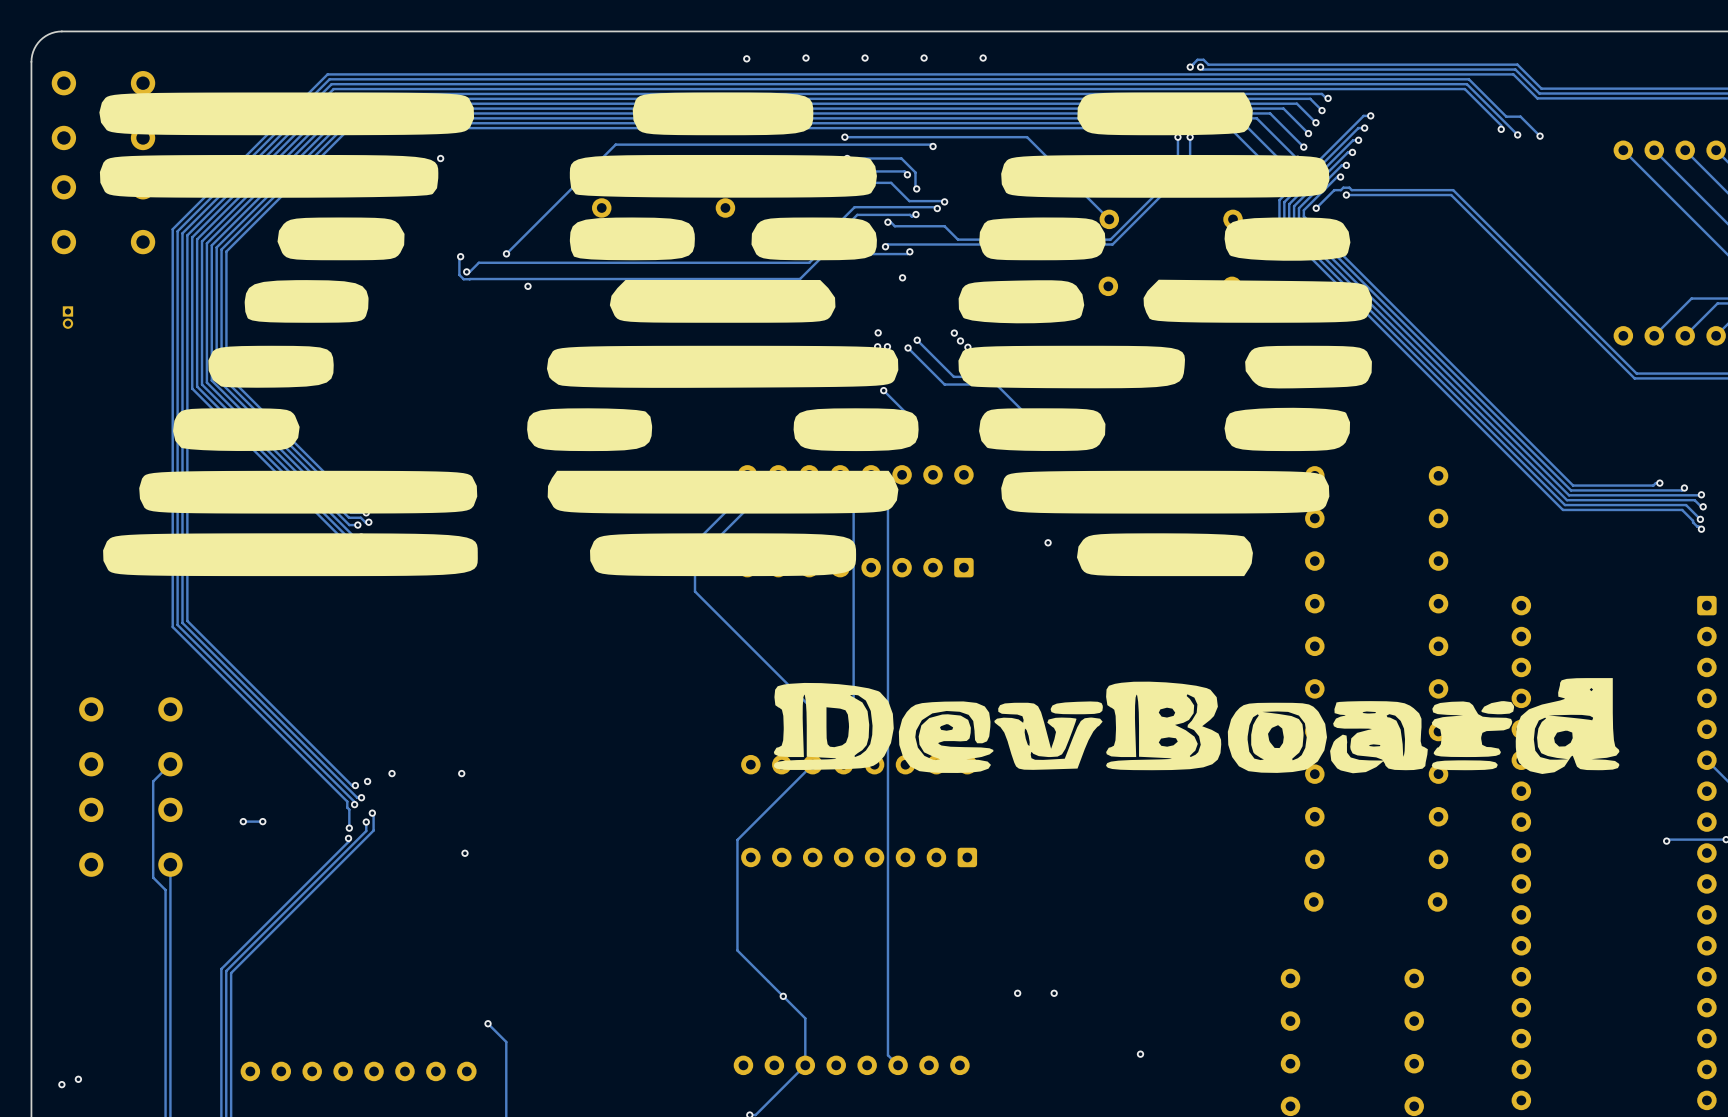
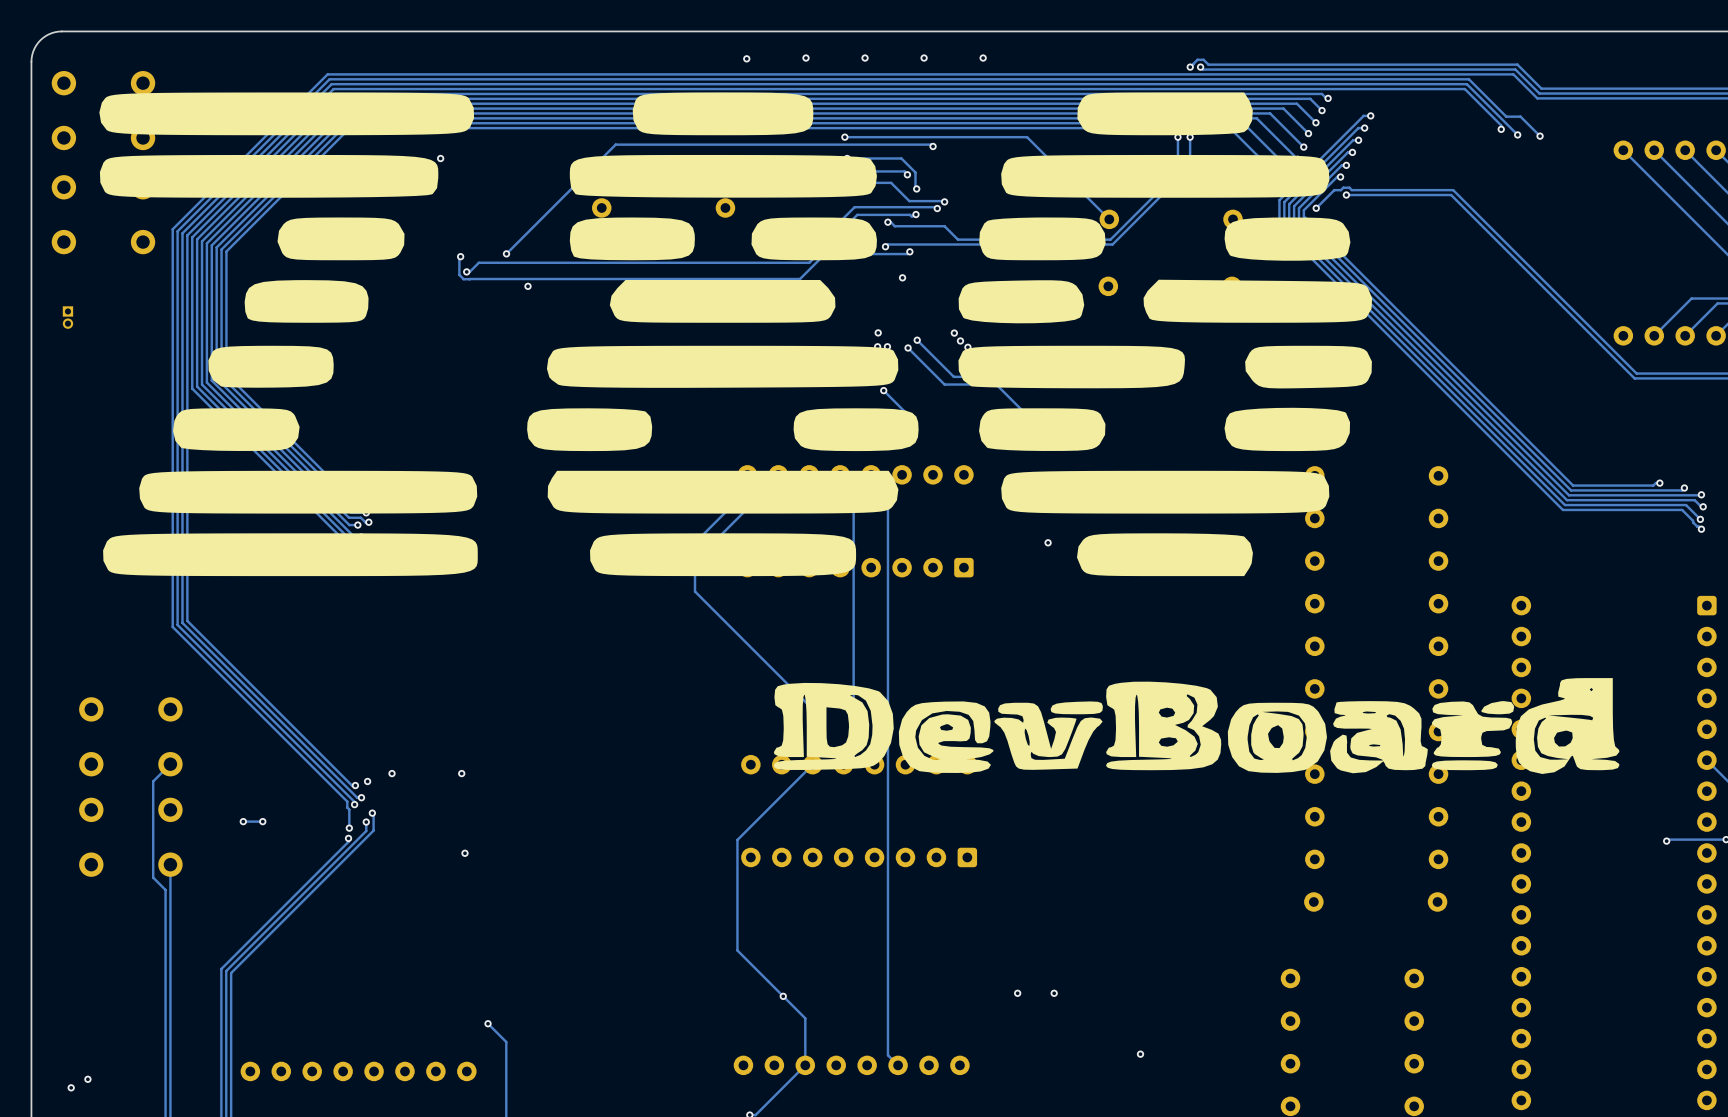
via: (78, 1079) -> none
via: none -> (87, 1079)
via: (61, 1084) -> none
via: none -> (71, 1087)

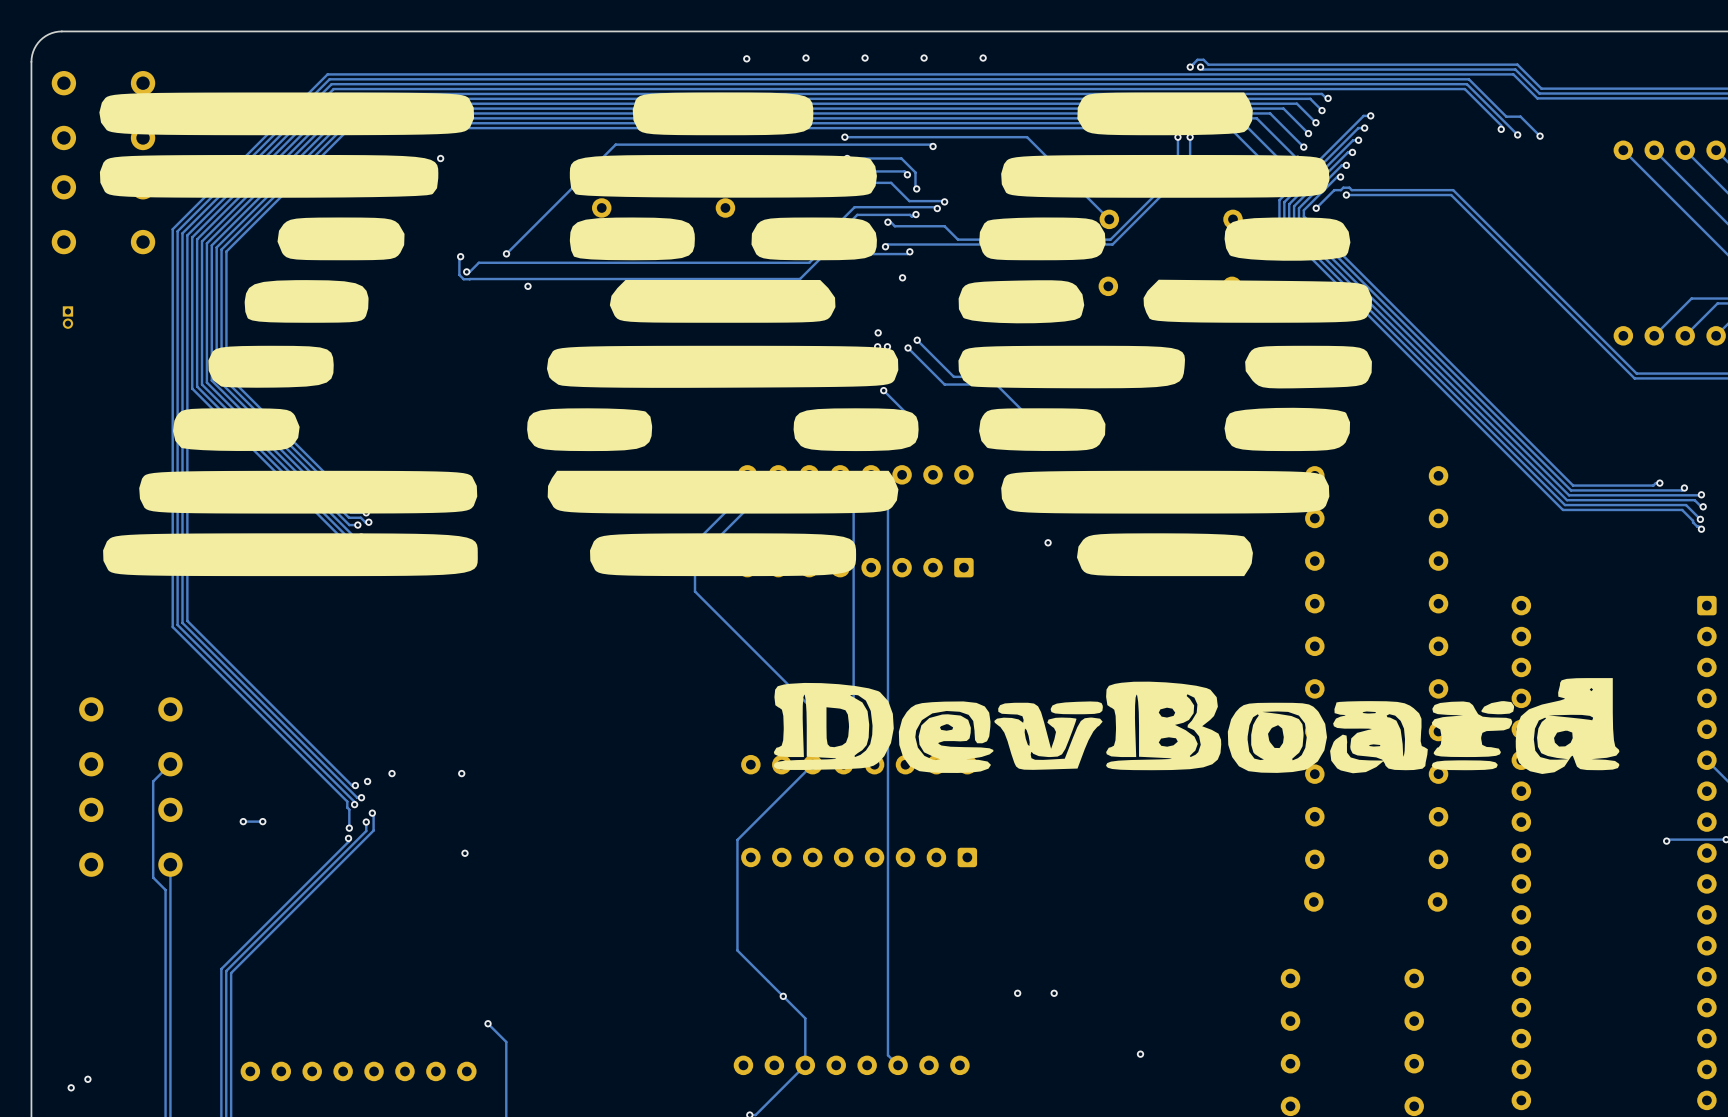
via: (954, 333) -> none
via: (960, 340) -> none
via: (967, 347) -> none

